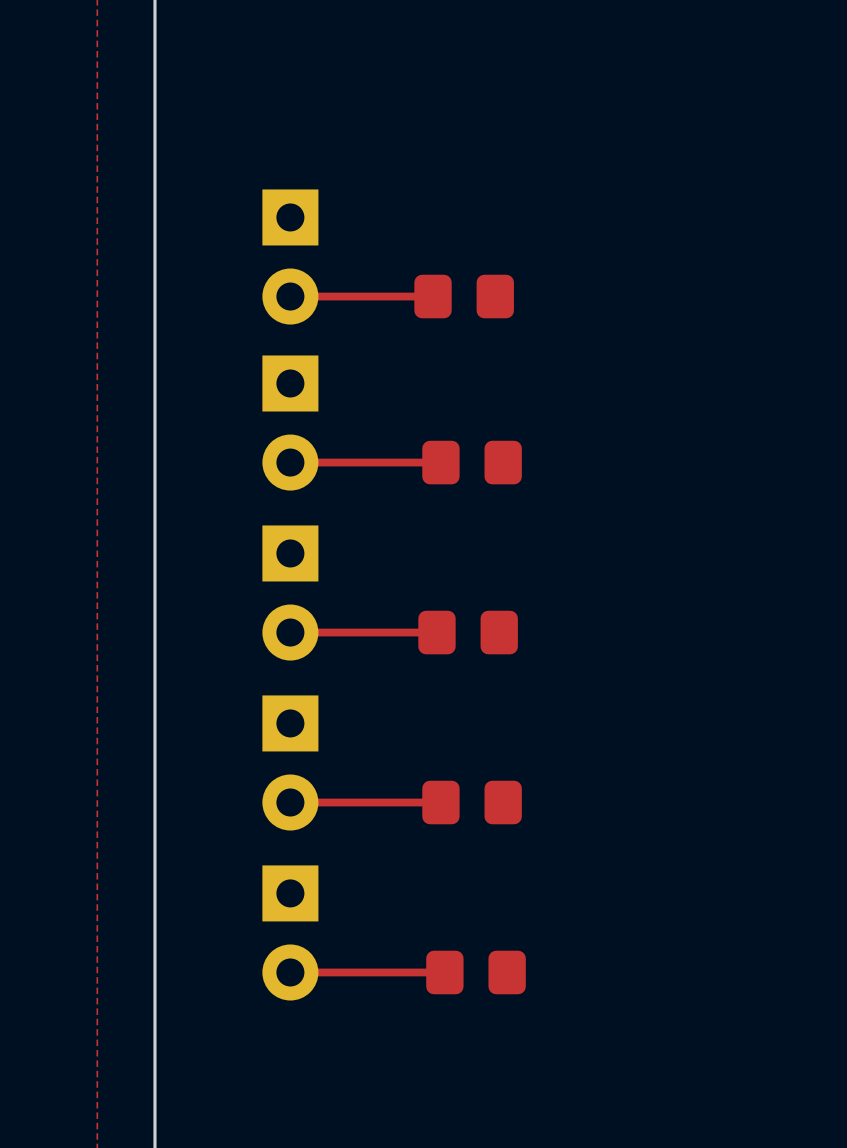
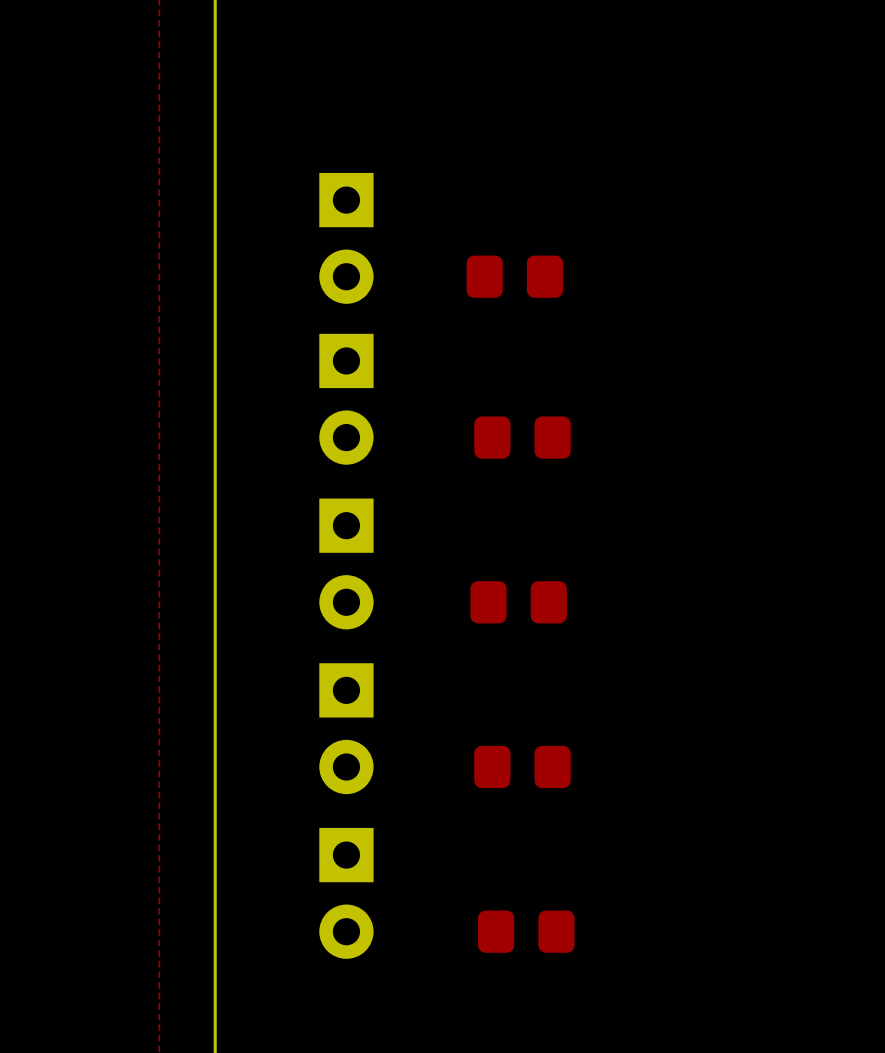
top track: (433, 296) (290, 296) -> none
top track: (440, 462) (290, 462) -> none
top track: (436, 632) (290, 632) -> none
top track: (440, 802) (290, 802) -> none
top track: (444, 972) (290, 972) -> none

